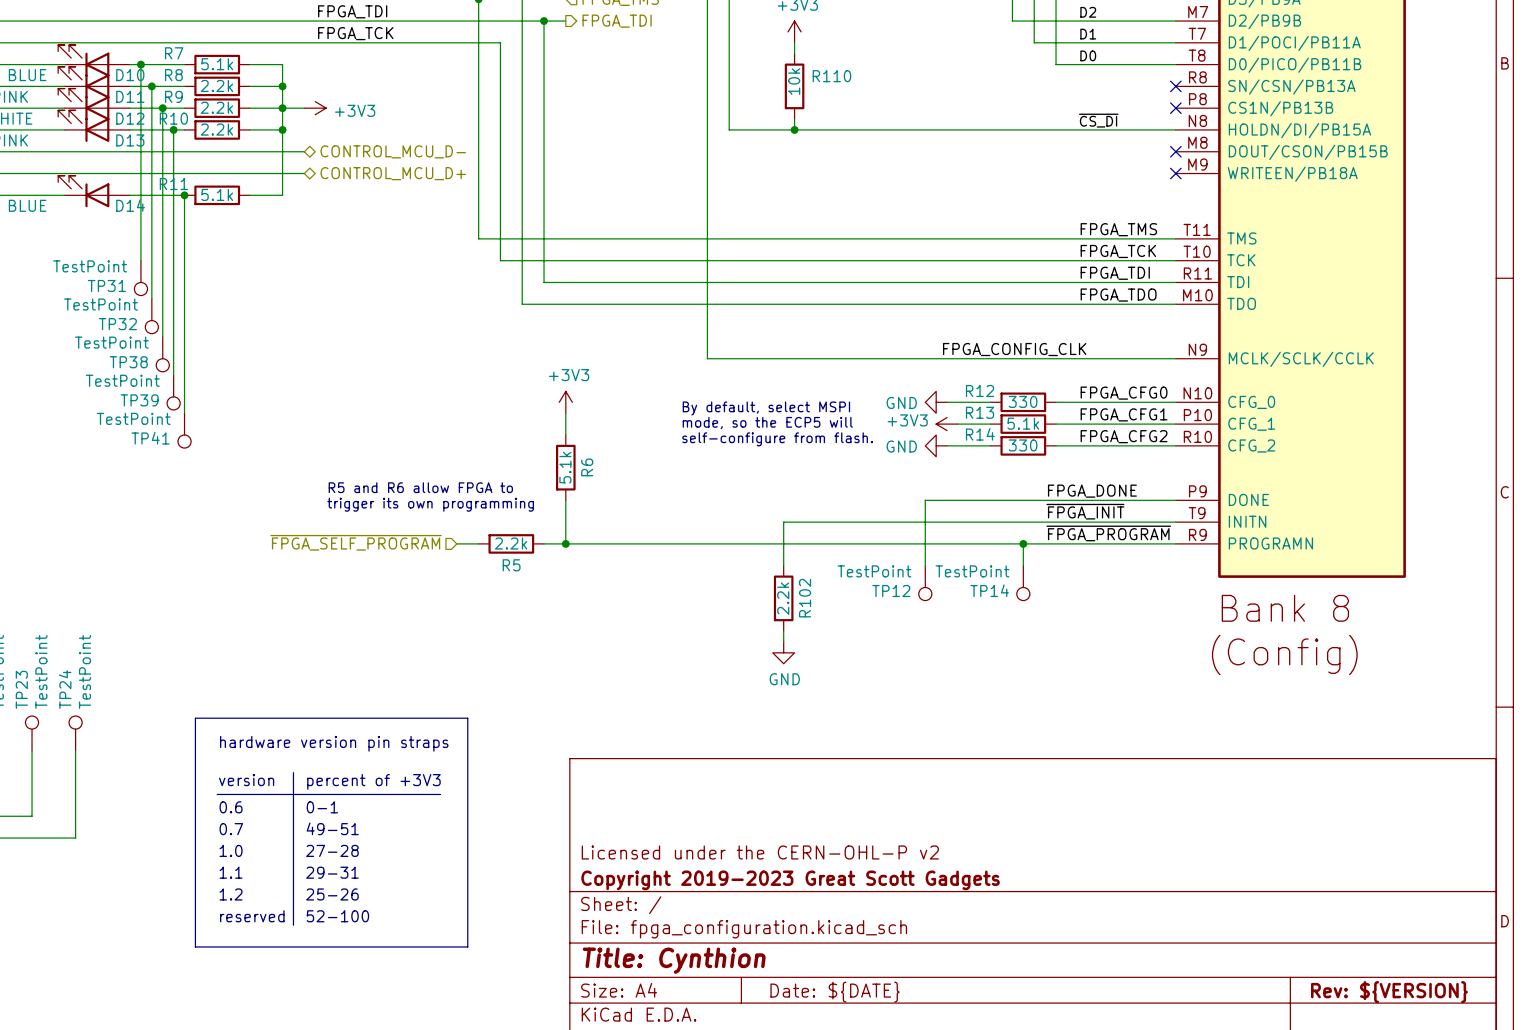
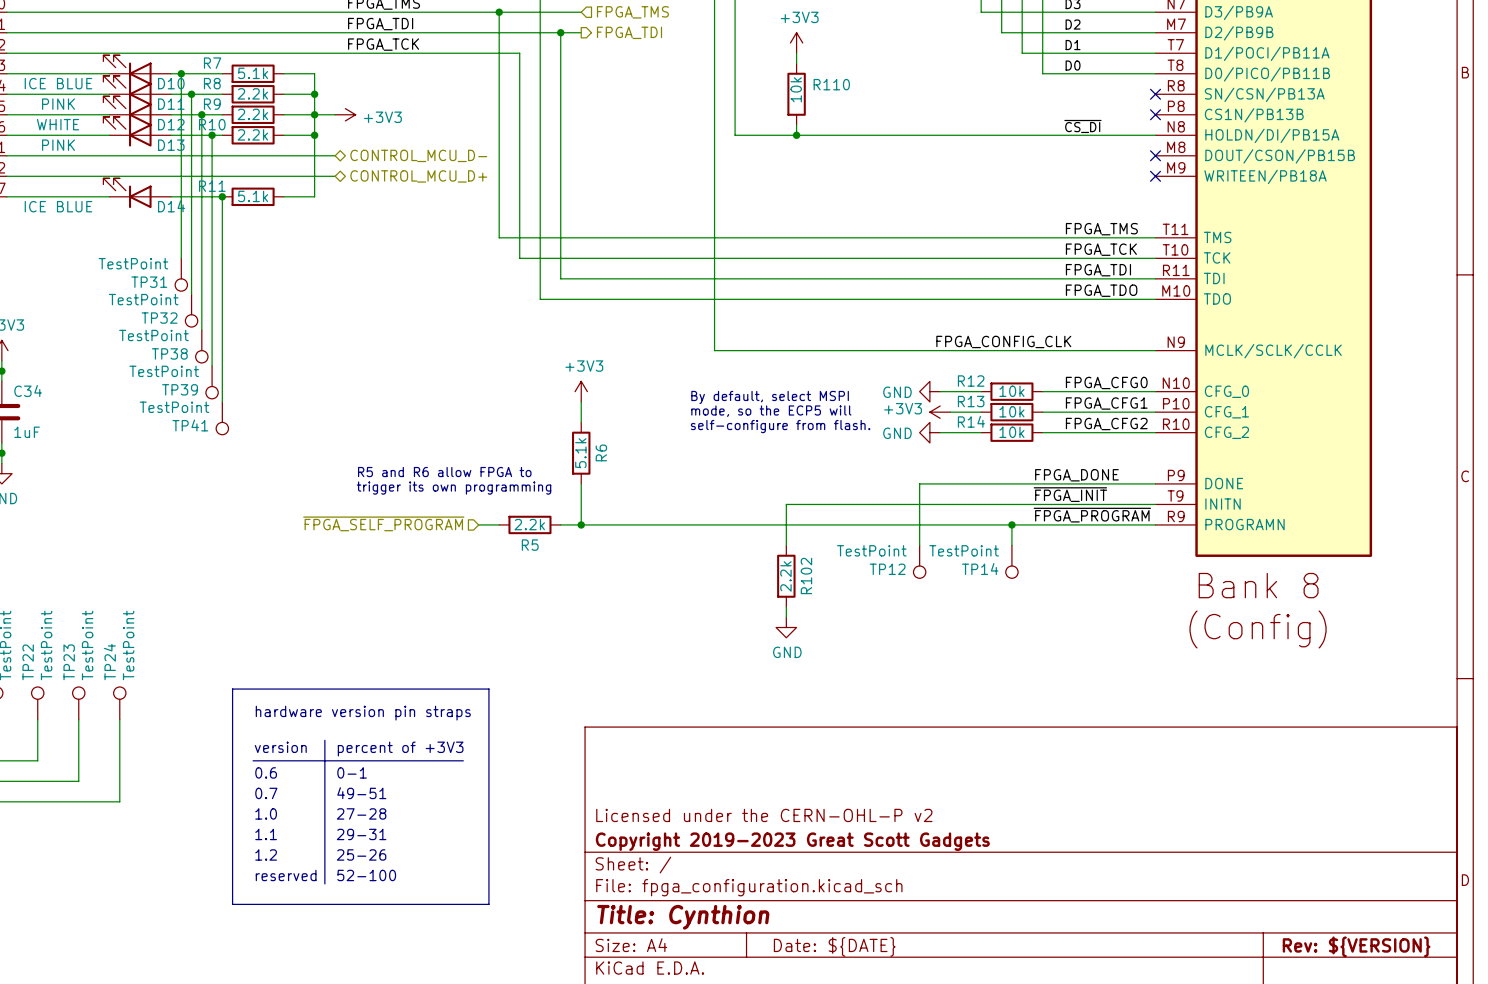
R12 value: 330 (1023, 401) -> 10k (1011, 391)
R13 value: 5.1k (1023, 423) -> 10k (1011, 411)
R14 value: 330 (1023, 445) -> 10k (1011, 432)

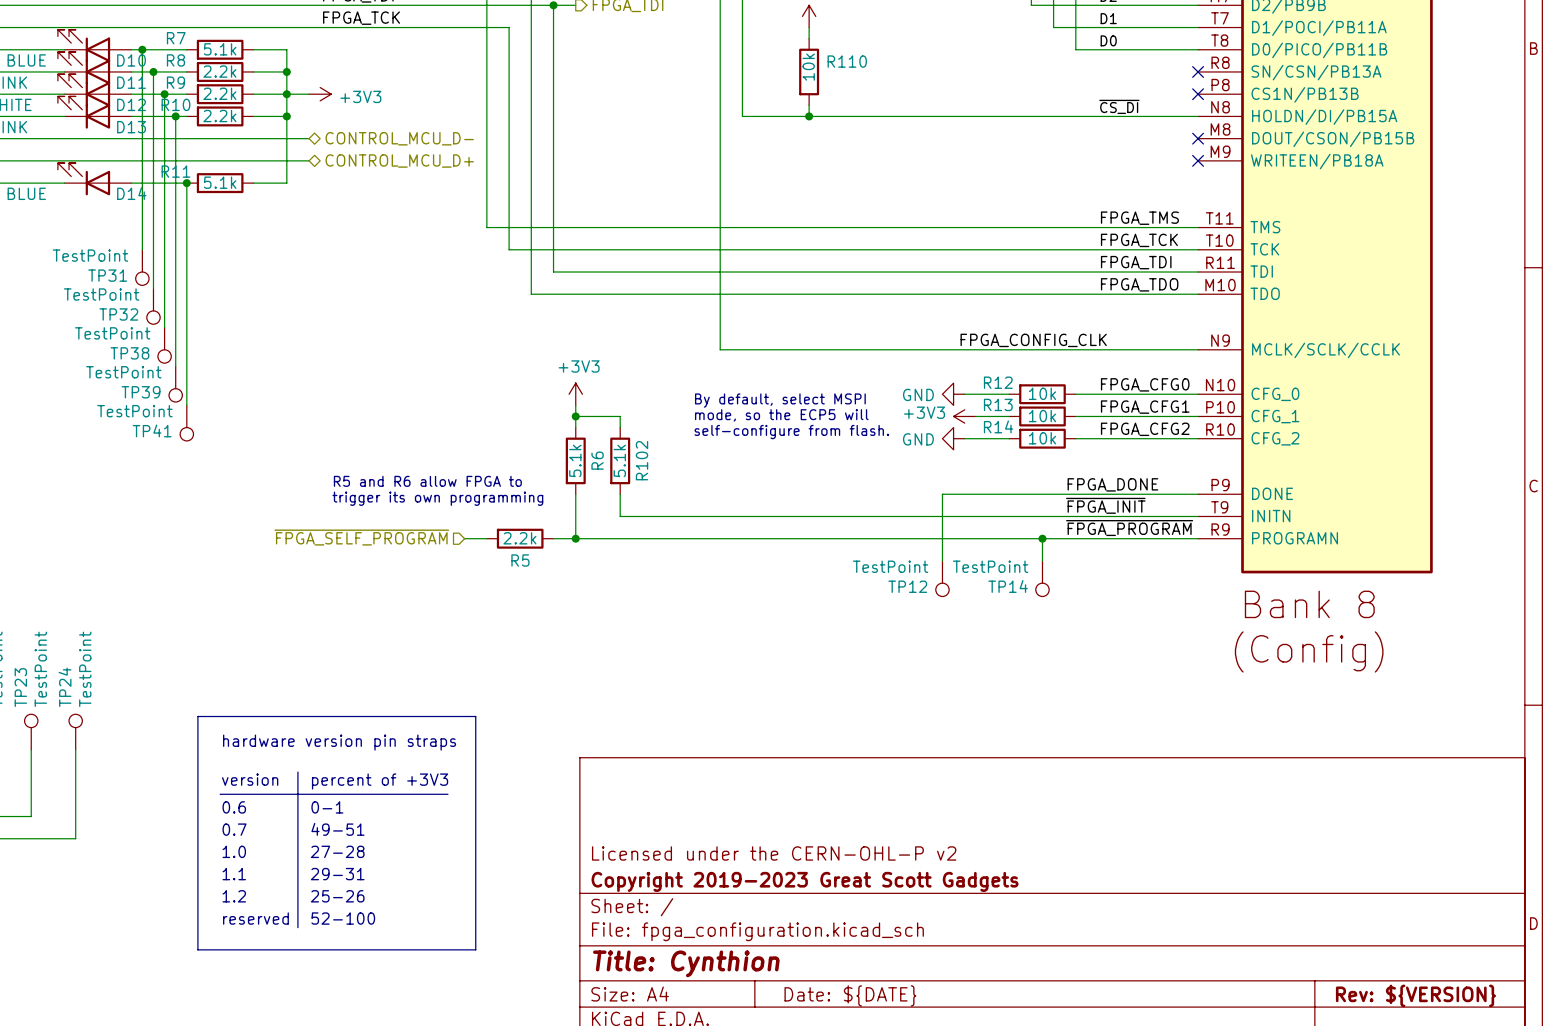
wire: none -> (575, 416) (620, 416) (620, 427)
junction: none -> (575, 416)
wire: (786, 504) (786, 545) -> (798, 516) (620, 516) (620, 494)
R102 value: 2.2k (785, 576) -> 5.1k (619, 460)
R102 position: (786, 576) -> (620, 460)
wire: (786, 607) (786, 617) -> none
power symbol: GND (786, 627) -> none

